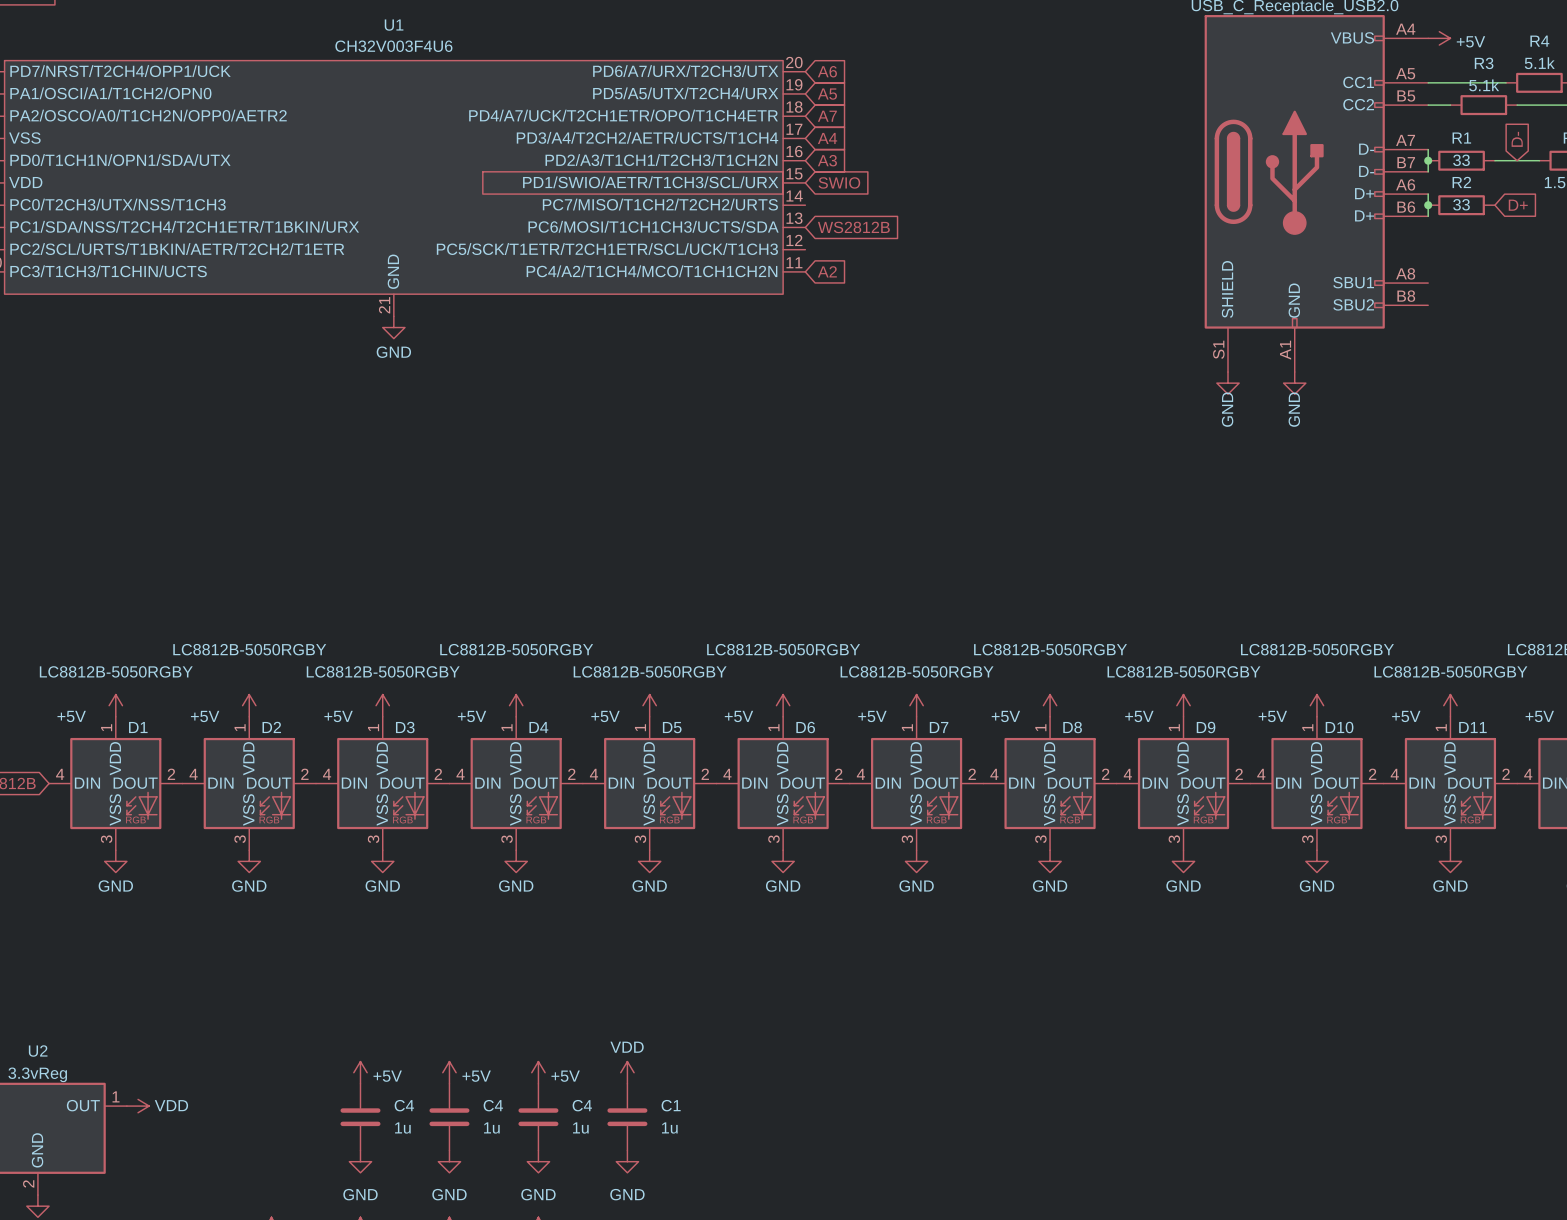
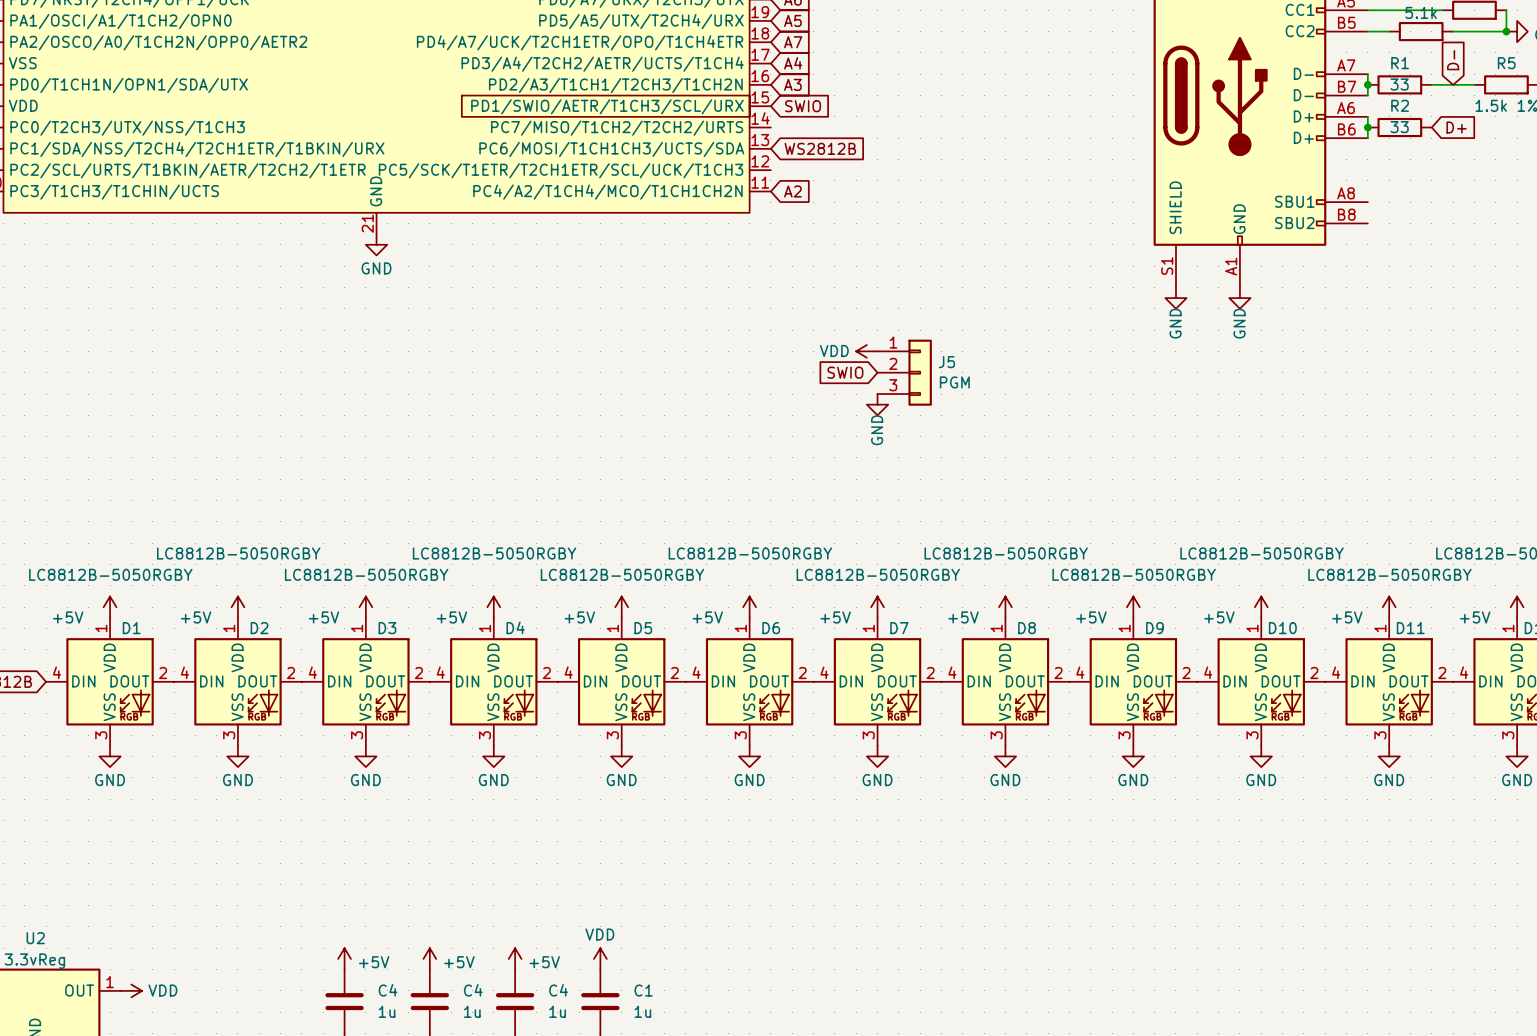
power symbol: none -> VDD (866, 351)
global label: none -> SWIO (845, 372)
J5: none -> PGM (904, 372)
power symbol: none -> GND (877, 404)

